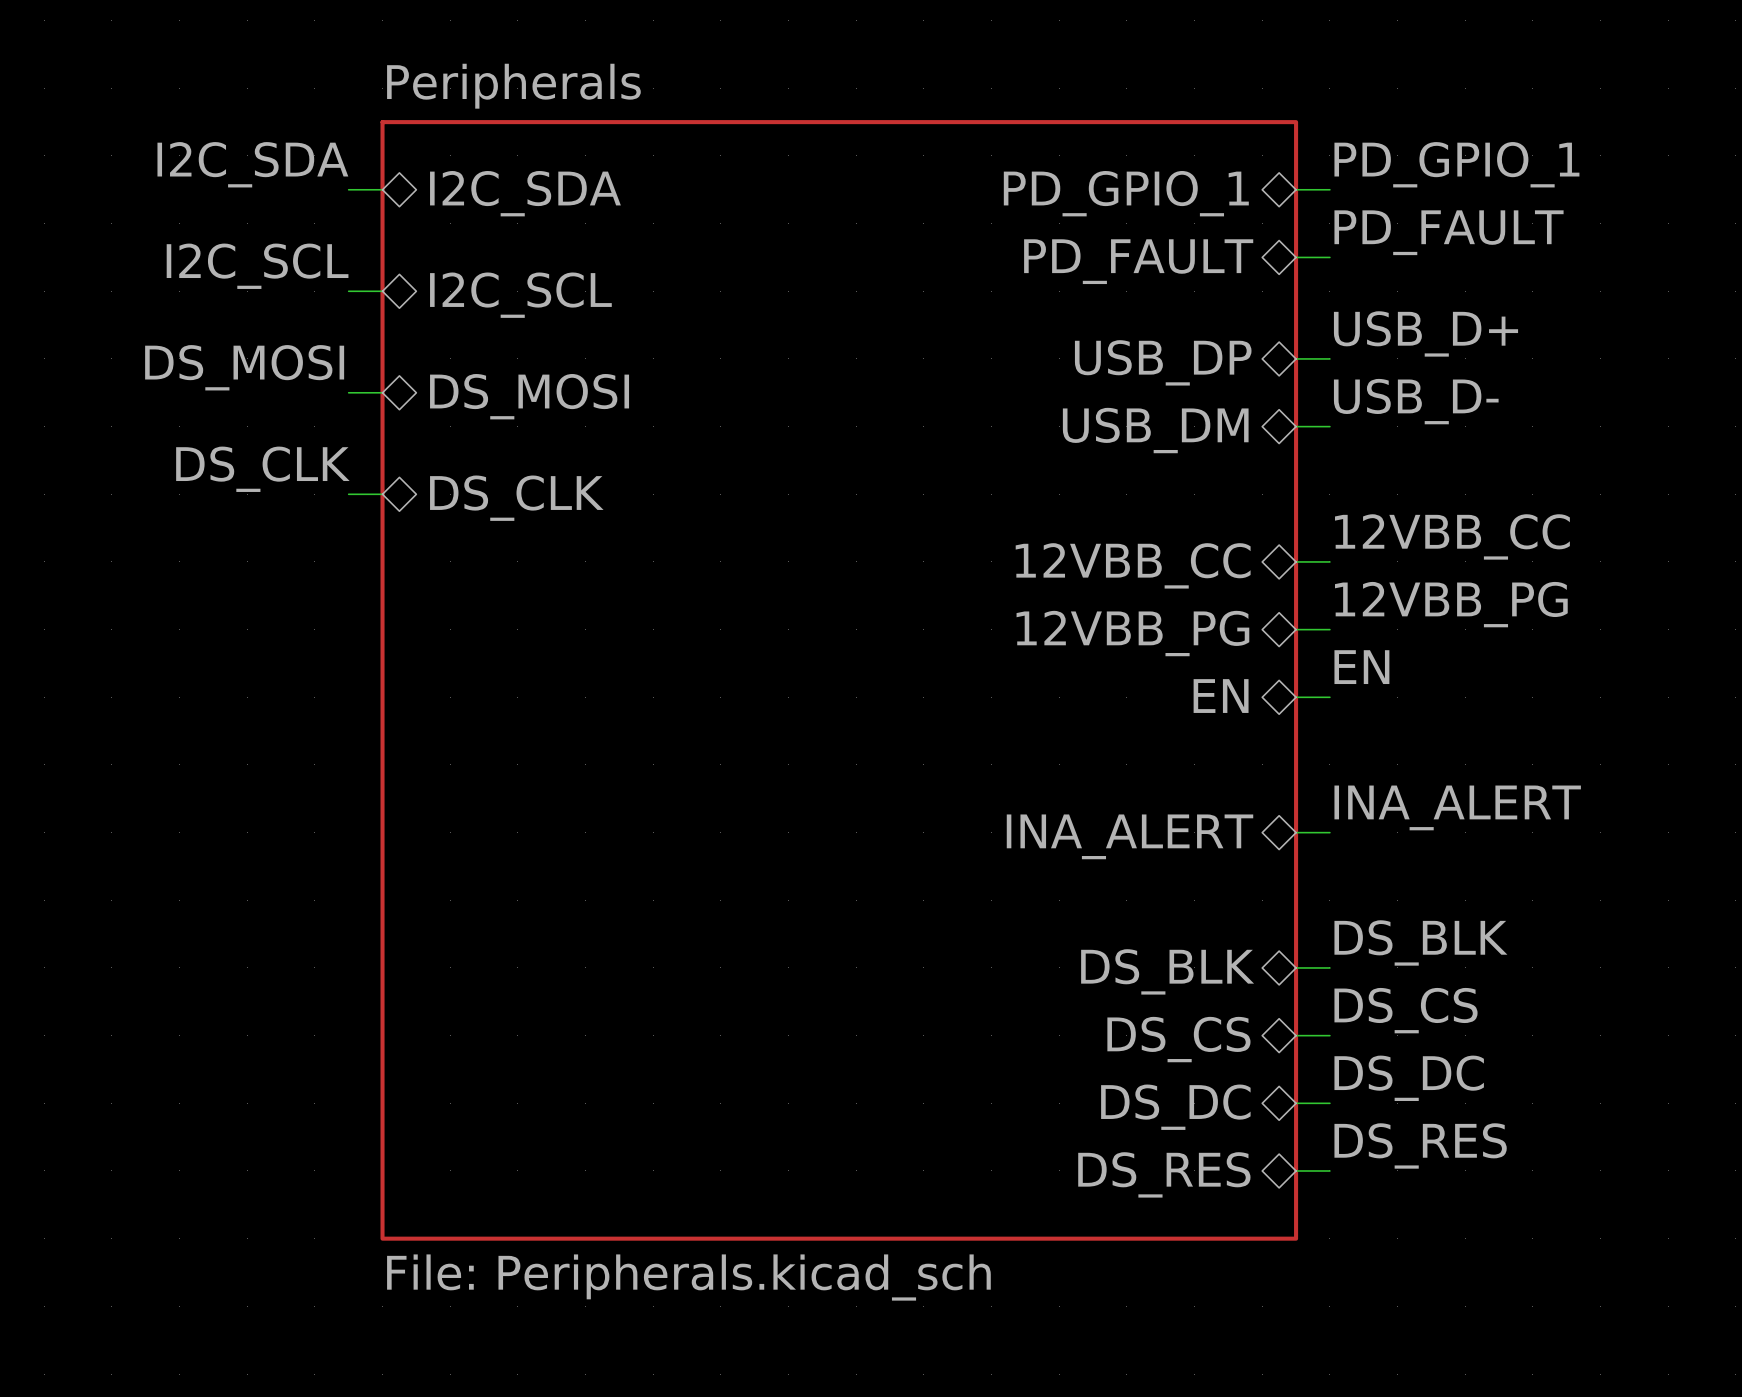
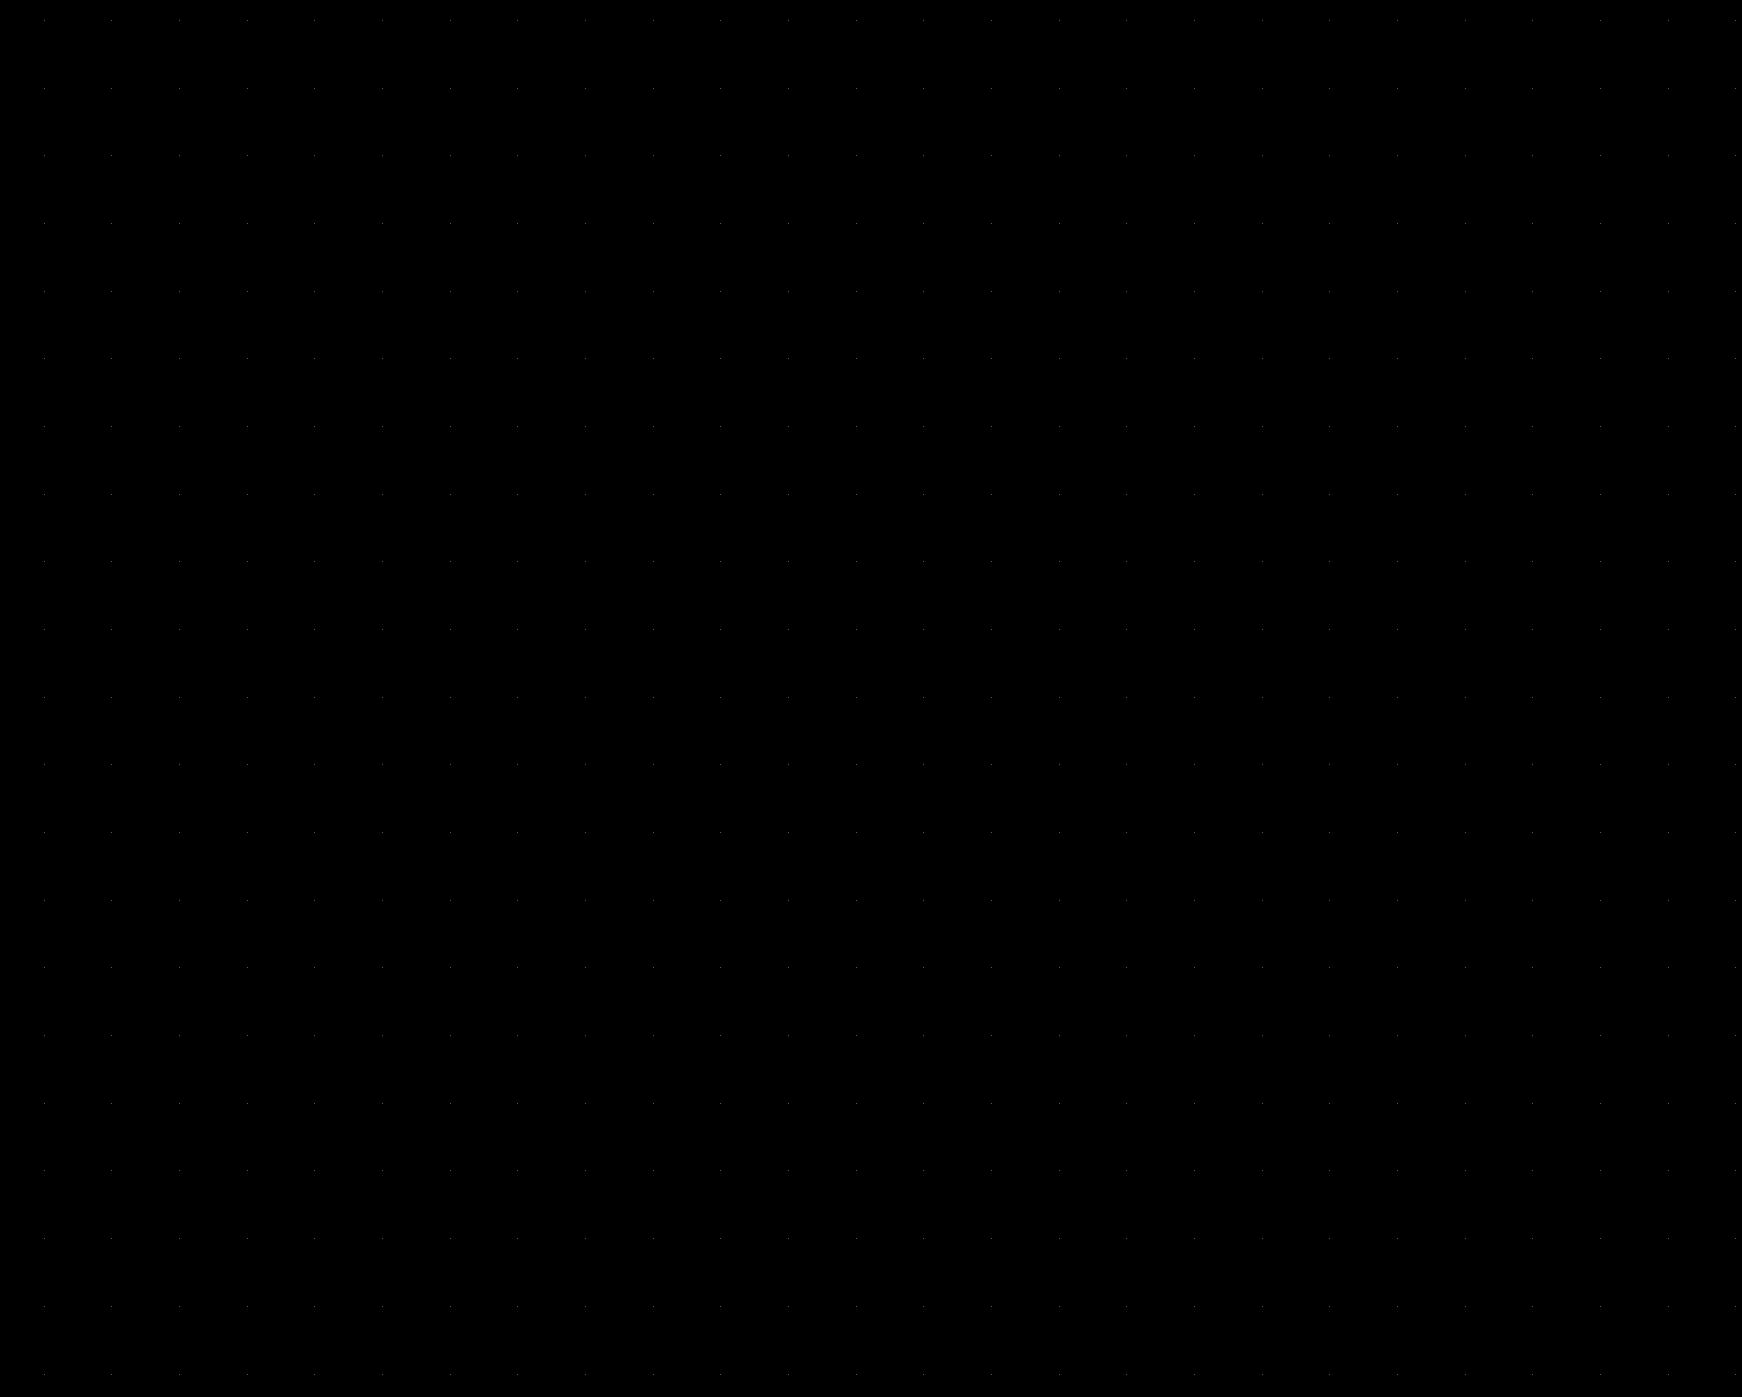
label: I2C_SDA (252, 164) -> none
label: PD_GPIO_1 (1456, 164) -> none
wire: (348, 189) (382, 189) -> none
wire: (1296, 189) (1329, 189) -> none
sheet pin: I2C_SDA (525, 193) -> none
sheet pin: PD_GPIO_1 (1126, 193) -> none
label: PD_FAULT (1449, 232) -> none
wire: (1296, 257) (1329, 257) -> none
sheet pin: PD_FAULT (1138, 261) -> none
label: I2C_SCL (257, 266) -> none
wire: (348, 291) (382, 291) -> none
sheet pin: I2C_SCL (520, 295) -> none
label: USB_D+ (1426, 333) -> none
wire: (1296, 358) (1329, 358) -> none
sheet pin: USB_DP (1163, 362) -> none
label: DS_MOSI (244, 367) -> none
wire: (348, 392) (382, 392) -> none
sheet pin: DS_MOSI (529, 396) -> none
label: USB_D- (1416, 401) -> none
wire: (1296, 426) (1329, 426) -> none
sheet pin: USB_DM (1155, 430) -> none
label: DS_CLK (262, 469) -> none
wire: (348, 494) (382, 494) -> none
sheet pin: DS_CLK (516, 498) -> none
label: 12VBB_CC (1452, 536) -> none
wire: (1296, 561) (1329, 561) -> none
sheet pin: 12VBB_CC (1133, 565) -> none
label: 12VBB_PG (1451, 604) -> none
wire: (1296, 629) (1329, 629) -> none
sheet pin: 12VBB_PG (1132, 633) -> none
label: EN (1361, 667) -> none
sheet Peripherals: File: Peripherals.kicad_sch (839, 680) -> none
sheet pin: EN (1221, 696) -> none
wire: (1296, 697) (1329, 697) -> none
label: INA_ALERT (1457, 807) -> none
wire: (1296, 832) (1329, 832) -> none
sheet pin: INA_ALERT (1130, 836) -> none
label: DS_BLK (1420, 942) -> none
wire: (1296, 967) (1329, 967) -> none
sheet pin: DS_BLK (1167, 971) -> none
label: DS_CS (1406, 1010) -> none
wire: (1296, 1035) (1329, 1035) -> none
sheet pin: DS_CS (1178, 1039) -> none
label: DS_DC (1409, 1078) -> none
wire: (1296, 1103) (1329, 1103) -> none
sheet pin: DS_DC (1175, 1107) -> none
label: DS_RES (1420, 1145) -> none
wire: (1296, 1170) (1329, 1170) -> none
sheet pin: DS_RES (1164, 1174) -> none

